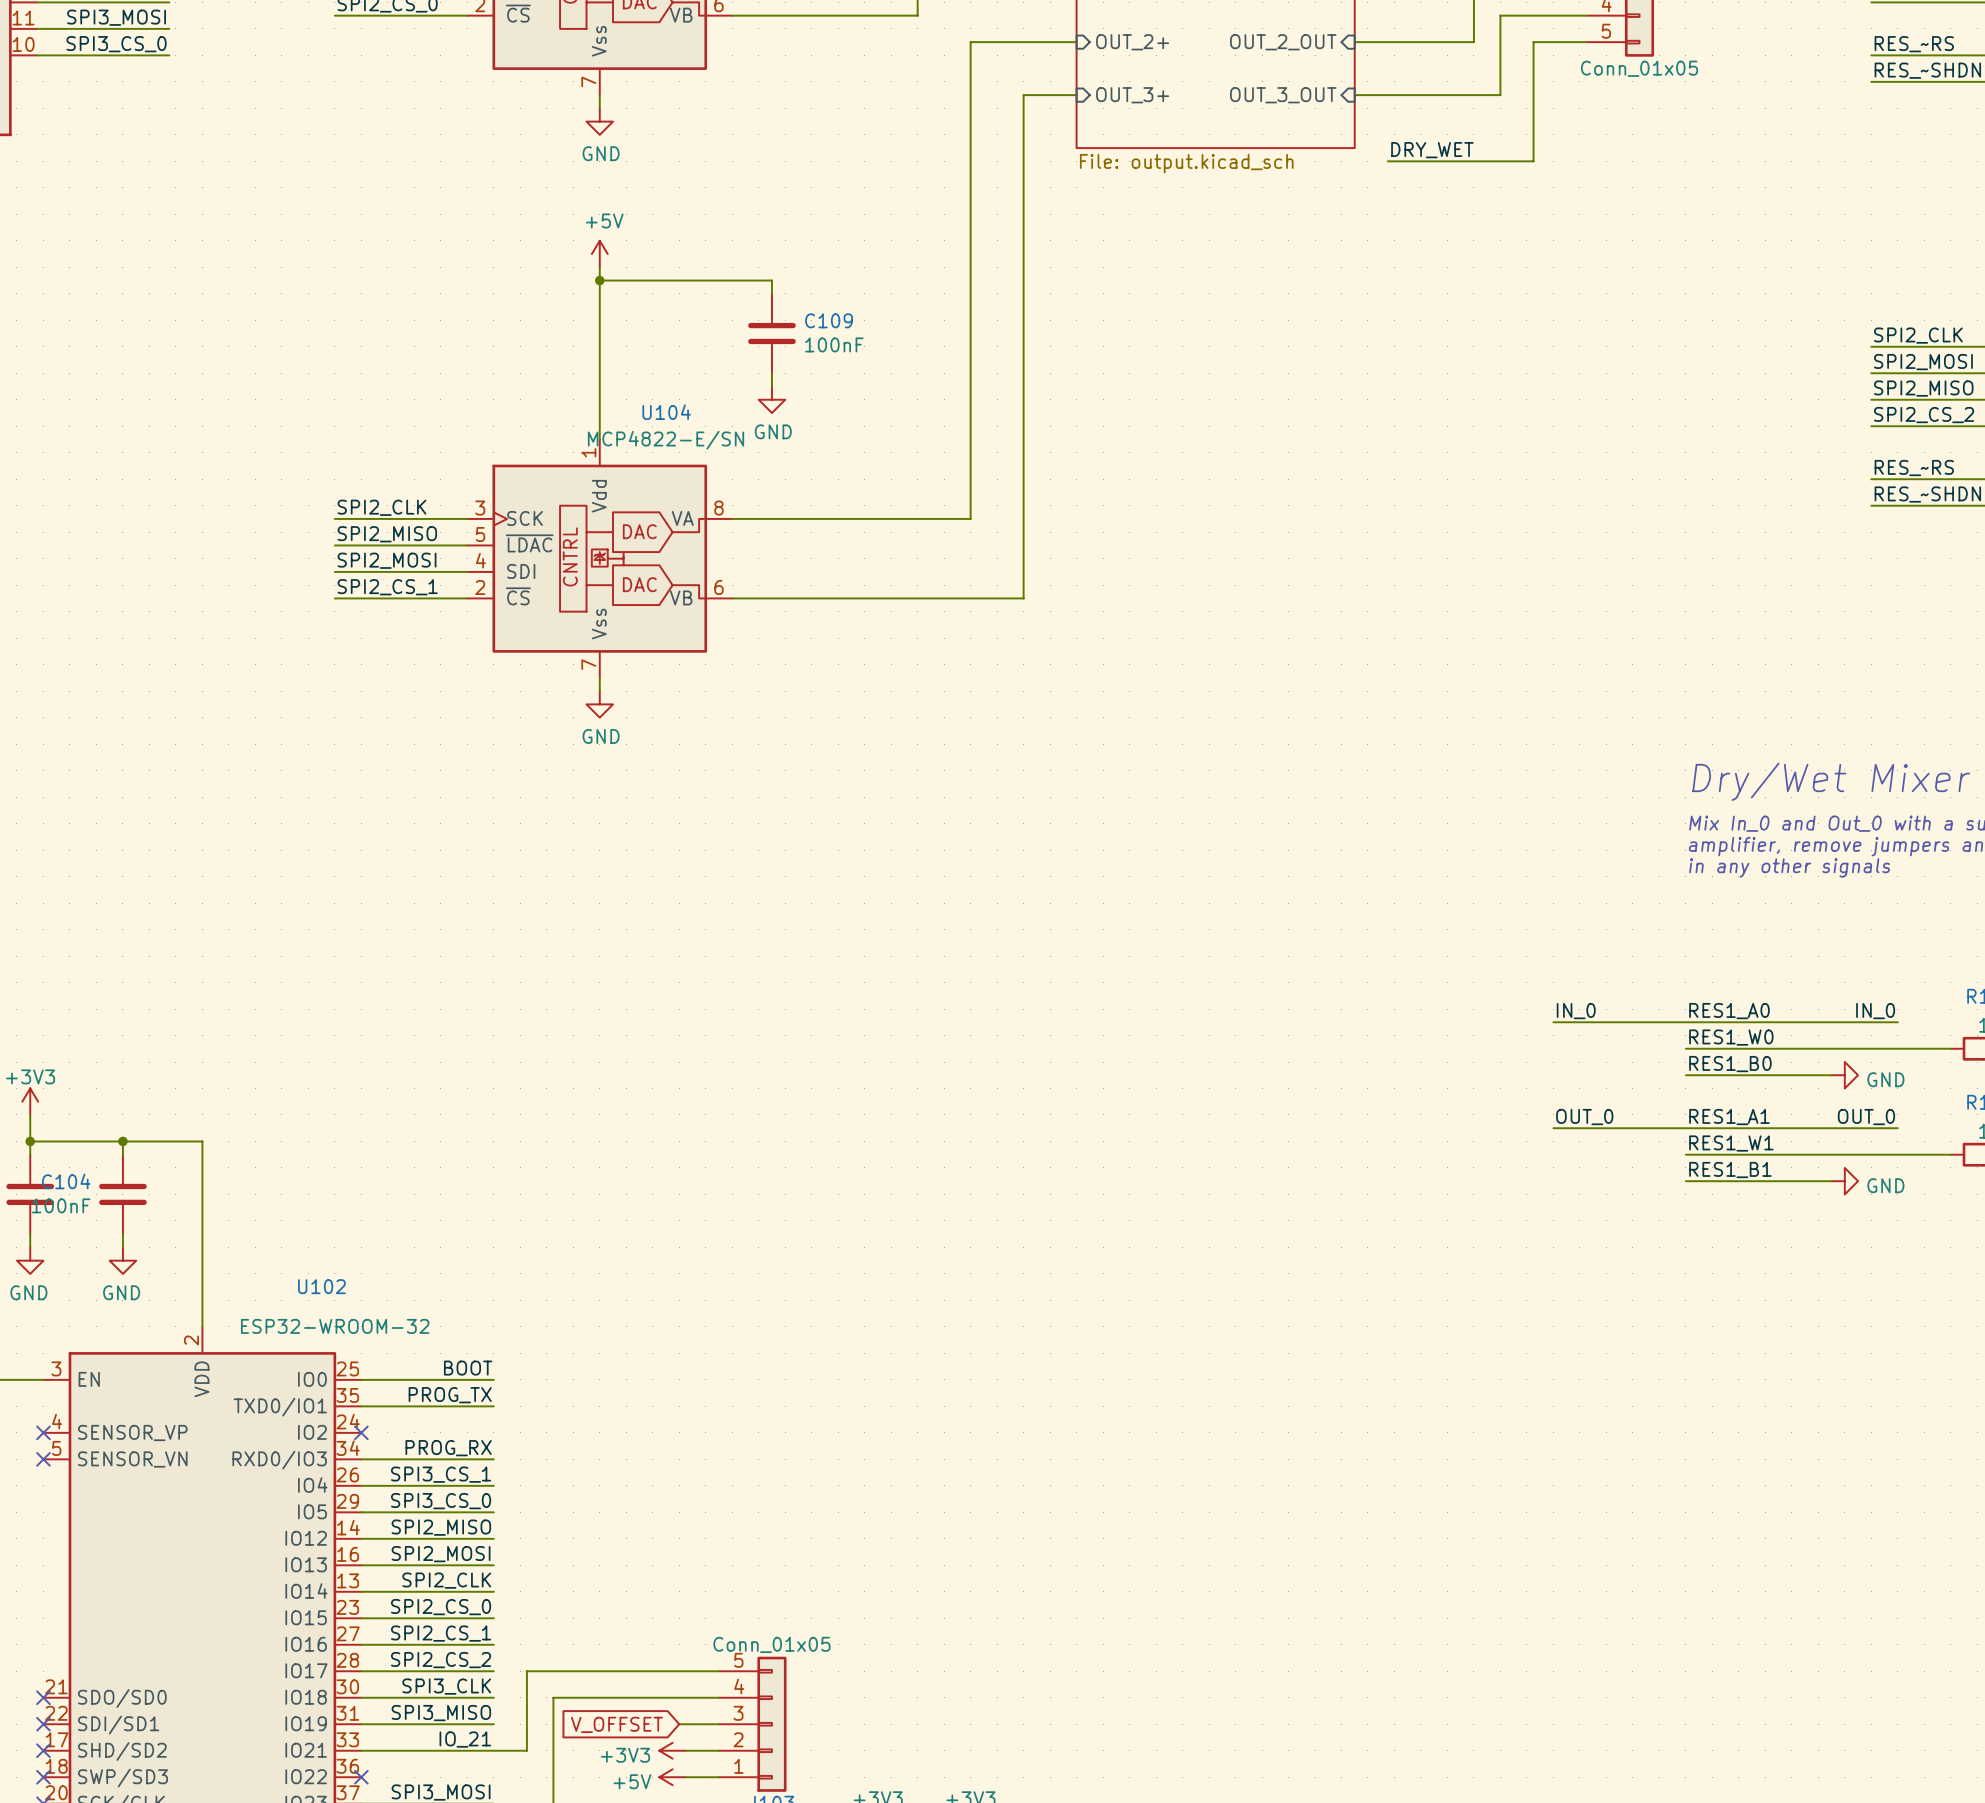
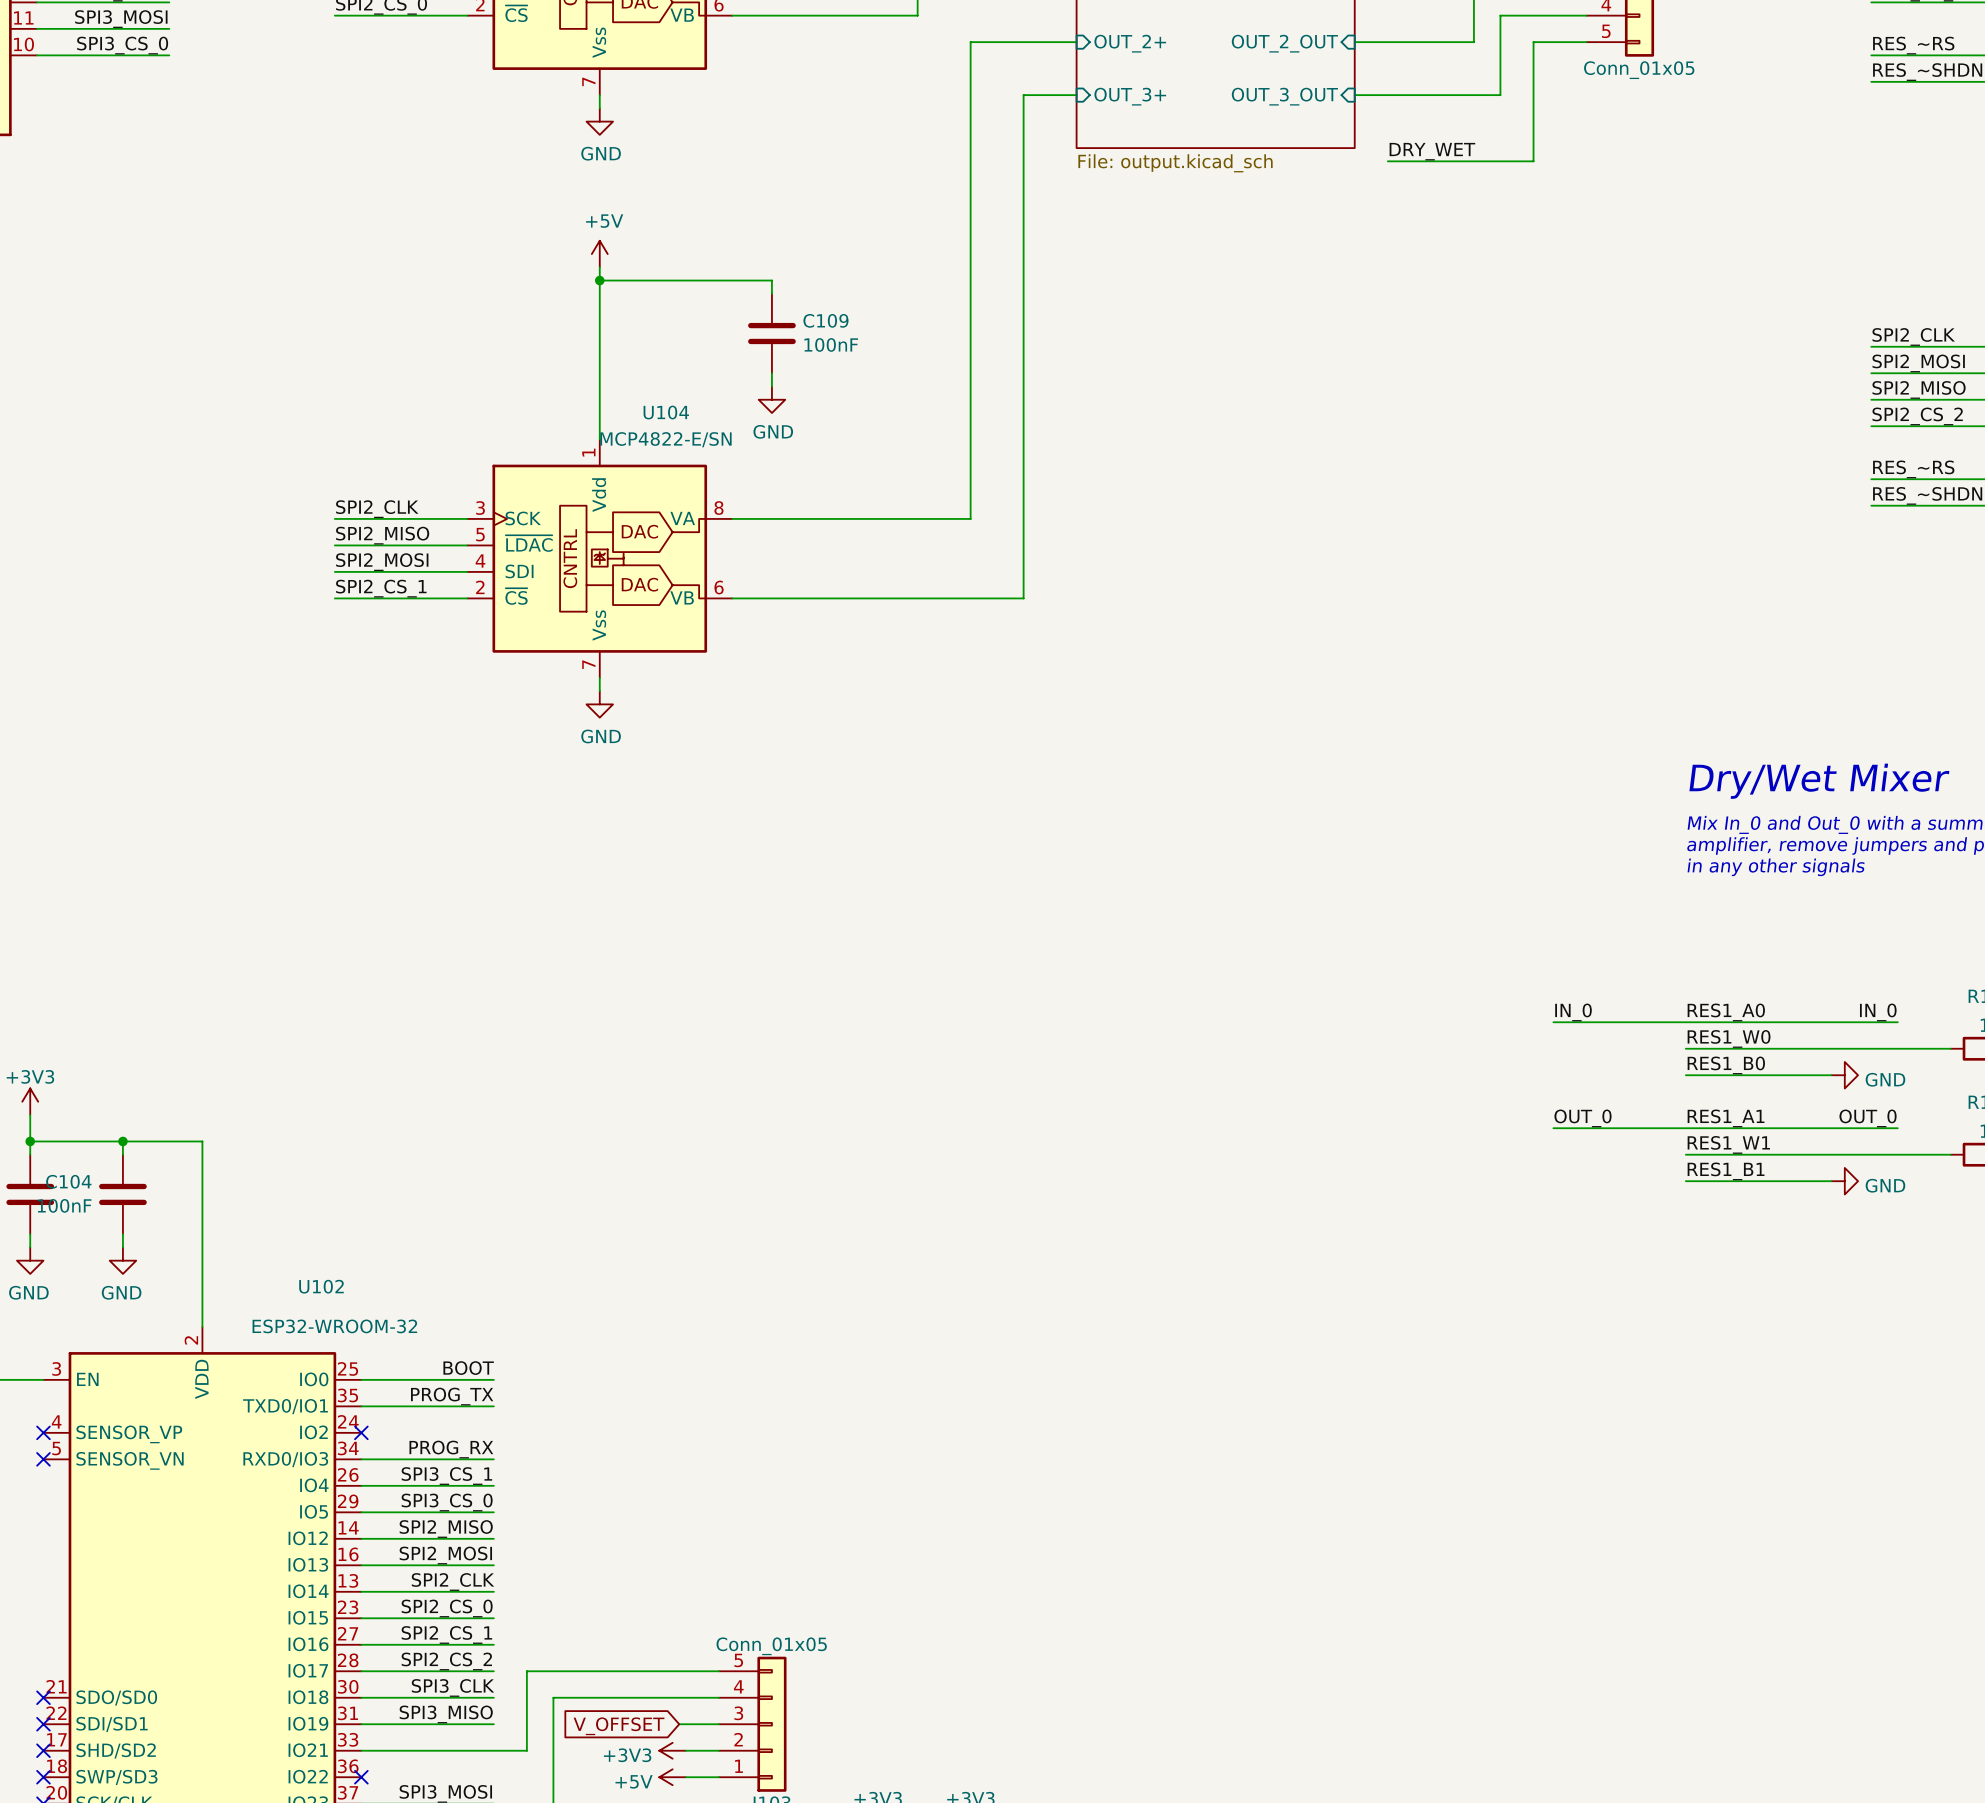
label: IO_21 (465, 1739) -> none

